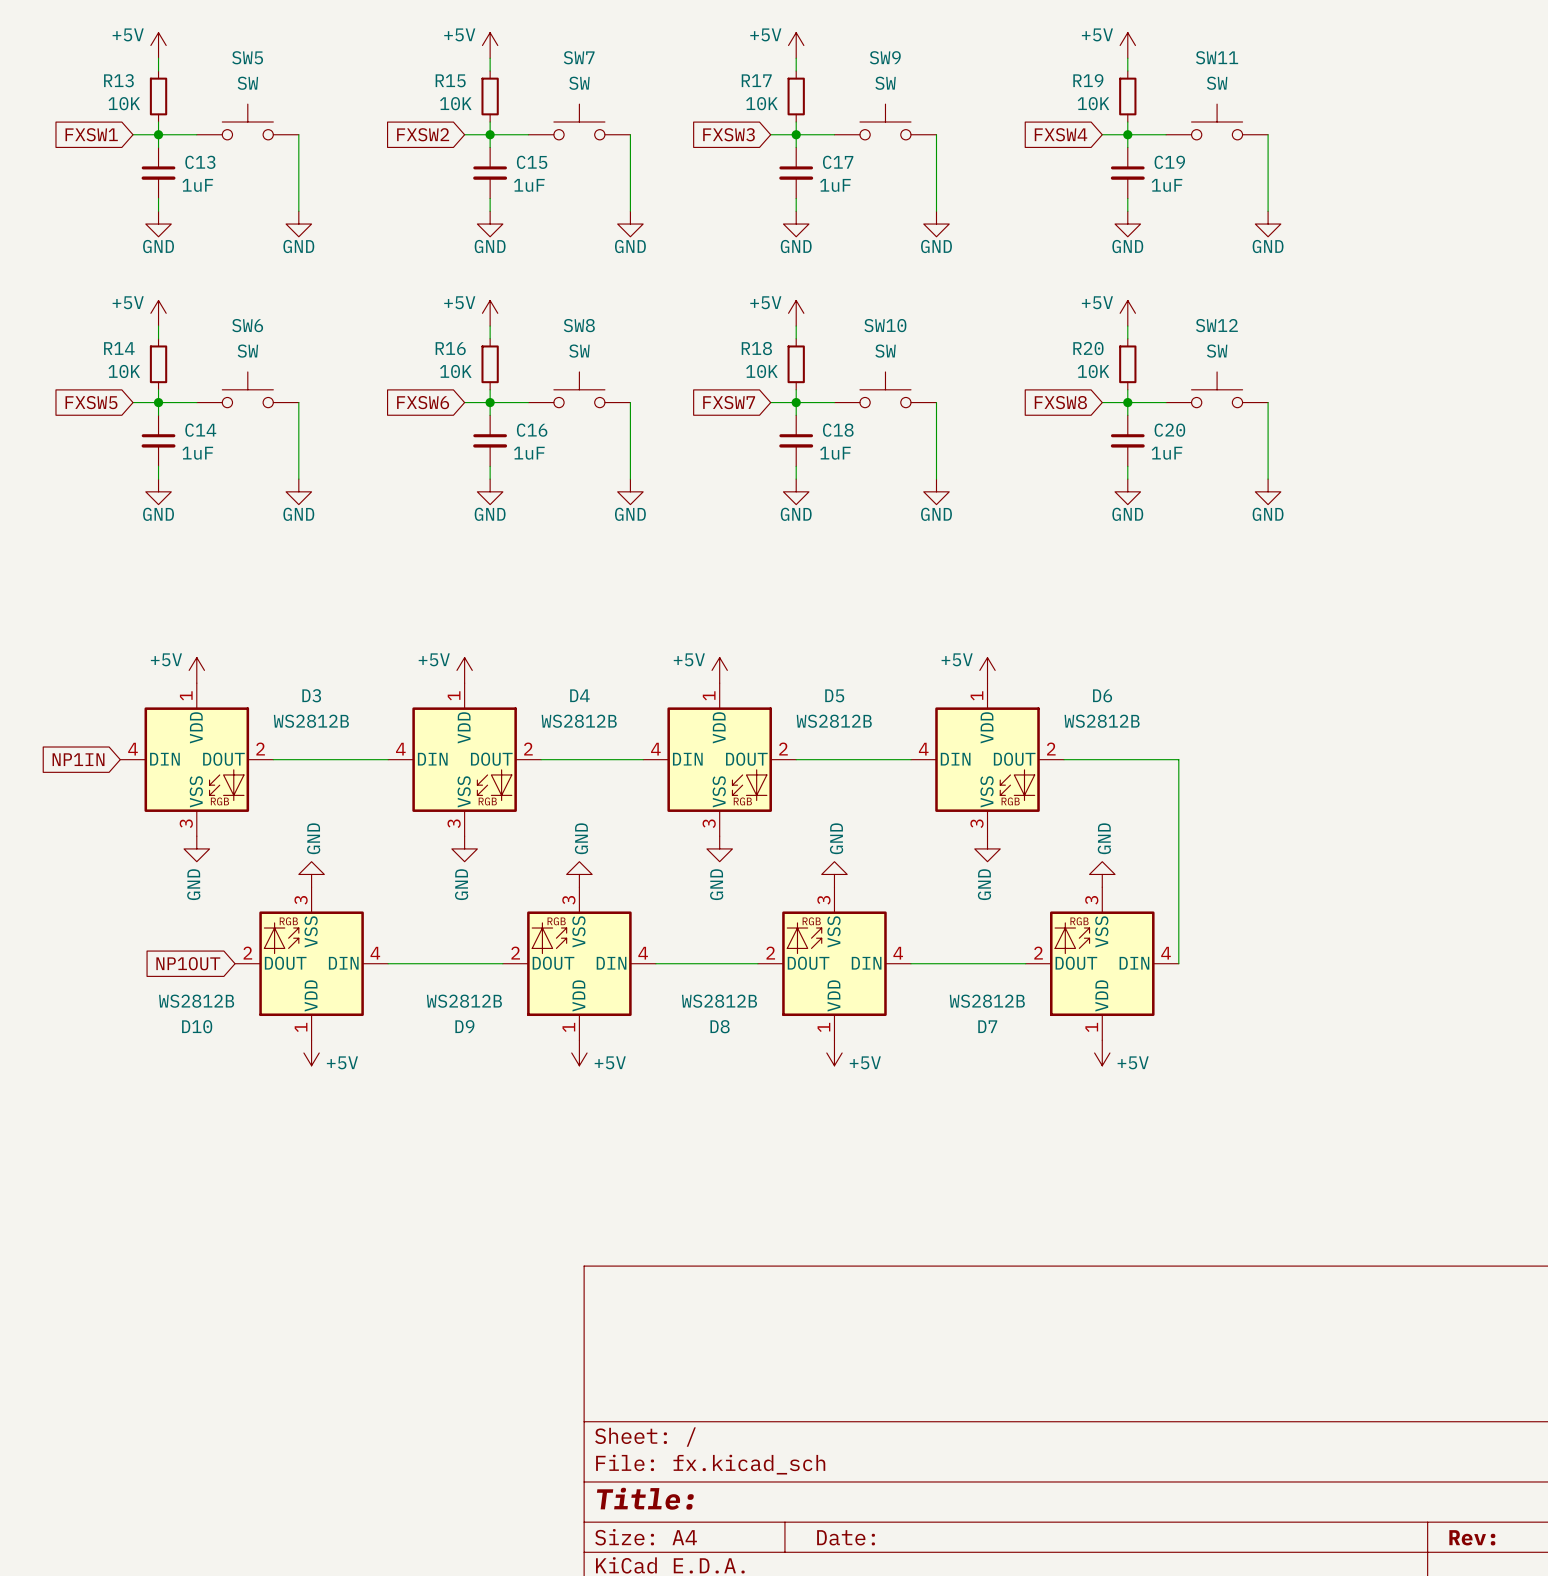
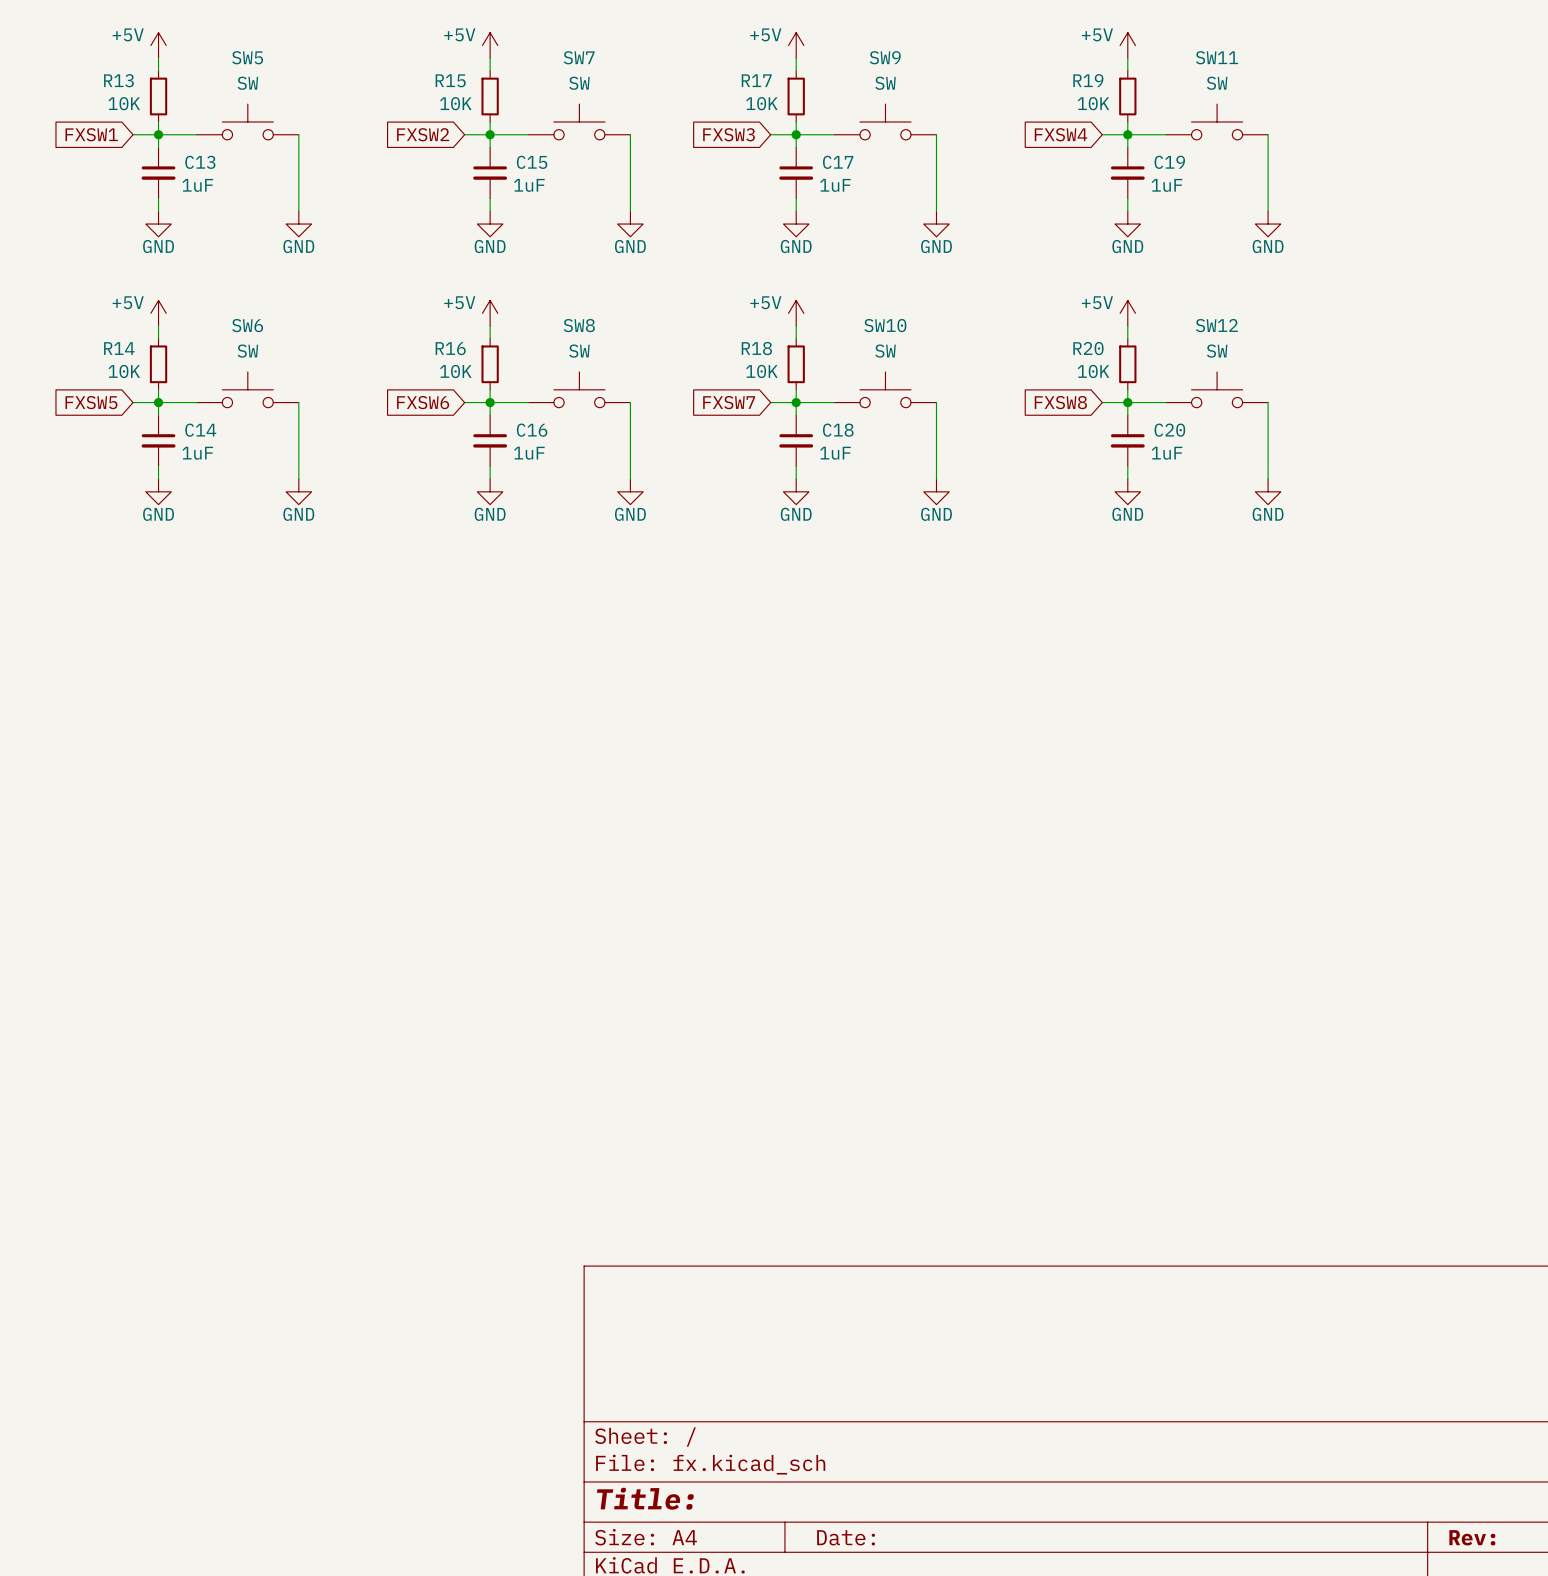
power symbol: +5V (196, 670) -> none
power symbol: +5V (464, 670) -> none
power symbol: +5V (719, 670) -> none
power symbol: +5V (987, 670) -> none
global label: NP1IN (78, 759) -> none
D3: WS2812B (196, 759) -> none
wire: (273, 759) (388, 759) -> none
D4: WS2812B (464, 759) -> none
wire: (541, 759) (643, 759) -> none
D5: WS2812B (719, 759) -> none
wire: (796, 759) (910, 759) -> none
D6: WS2812B (987, 759) -> none
wire: (1064, 759) (1178, 759) (1178, 963) -> none
power symbol: GND (196, 848) -> none
power symbol: GND (464, 848) -> none
power symbol: GND (719, 848) -> none
power symbol: GND (987, 848) -> none
power symbol: GND (311, 874) -> none
power symbol: GND (579, 874) -> none
power symbol: GND (834, 874) -> none
power symbol: GND (1102, 874) -> none
global label: NP1OUT (188, 963) -> none
D10: WS2812B (311, 963) -> none
wire: (388, 963) (502, 963) -> none
D9: WS2812B (579, 963) -> none
wire: (655, 963) (757, 963) -> none
D8: WS2812B (834, 963) -> none
wire: (910, 963) (1025, 963) -> none
D7: WS2812B (1102, 963) -> none
power symbol: +5V (311, 1052) -> none
power symbol: +5V (579, 1052) -> none
power symbol: +5V (834, 1052) -> none
power symbol: +5V (1102, 1052) -> none

